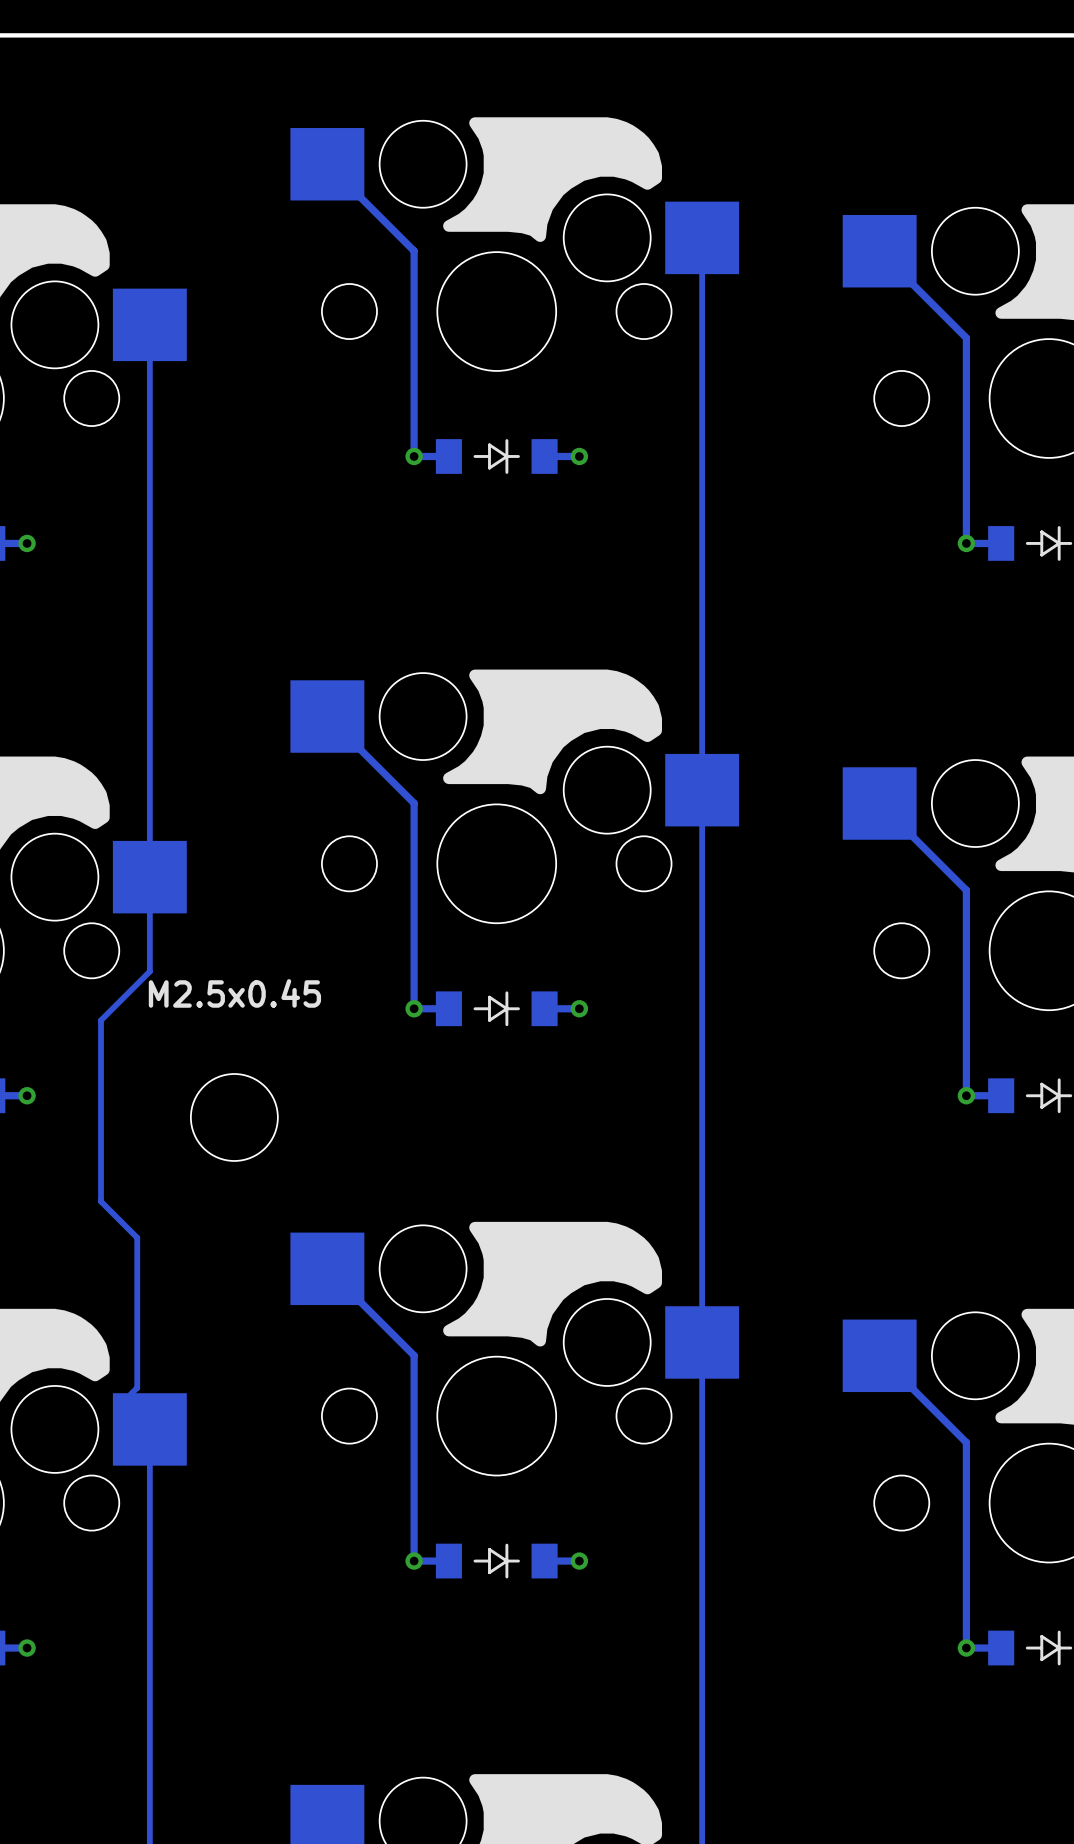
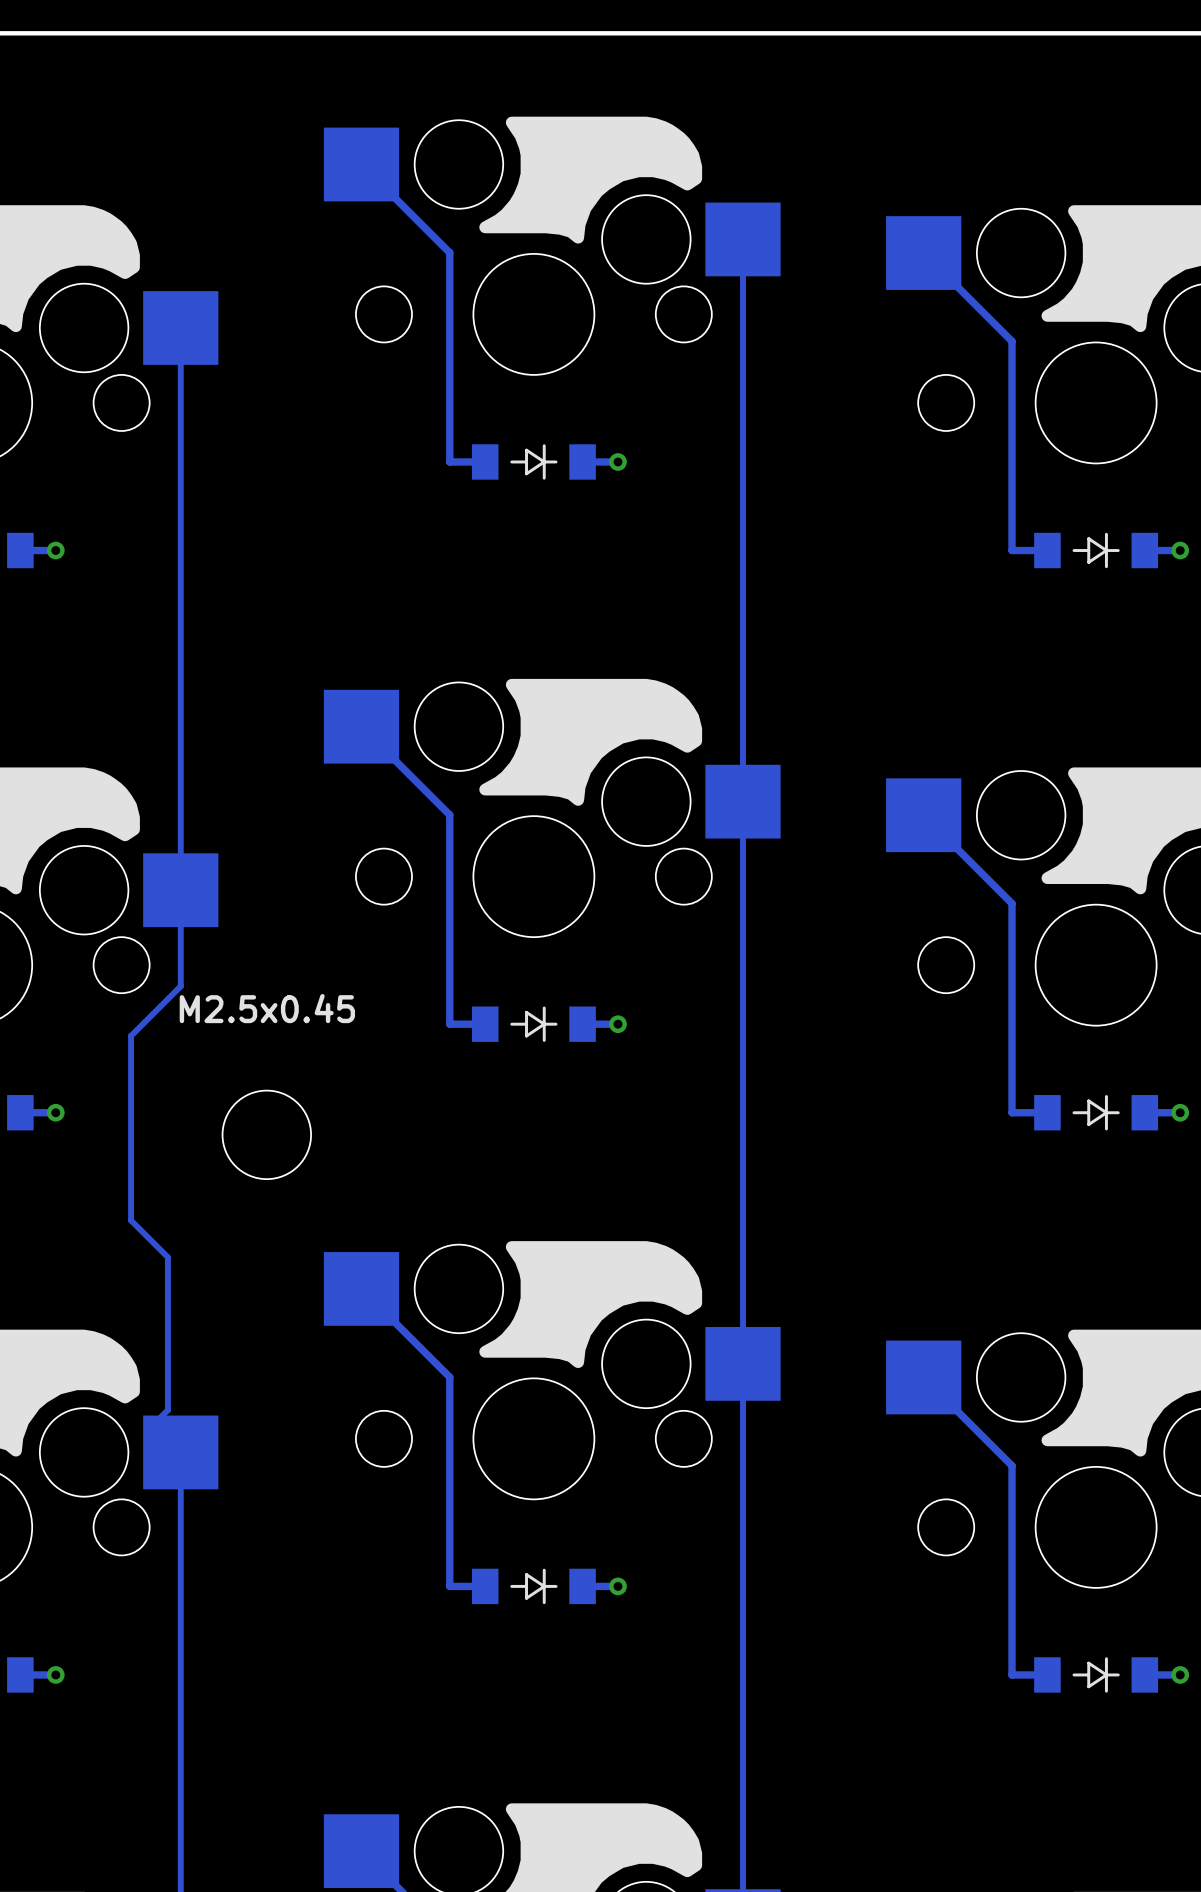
via: (414, 456) -> none
via: (966, 543) -> none
via: (414, 1008) -> none
via: (966, 1095) -> none
via: (414, 1561) -> none
via: (966, 1648) -> none

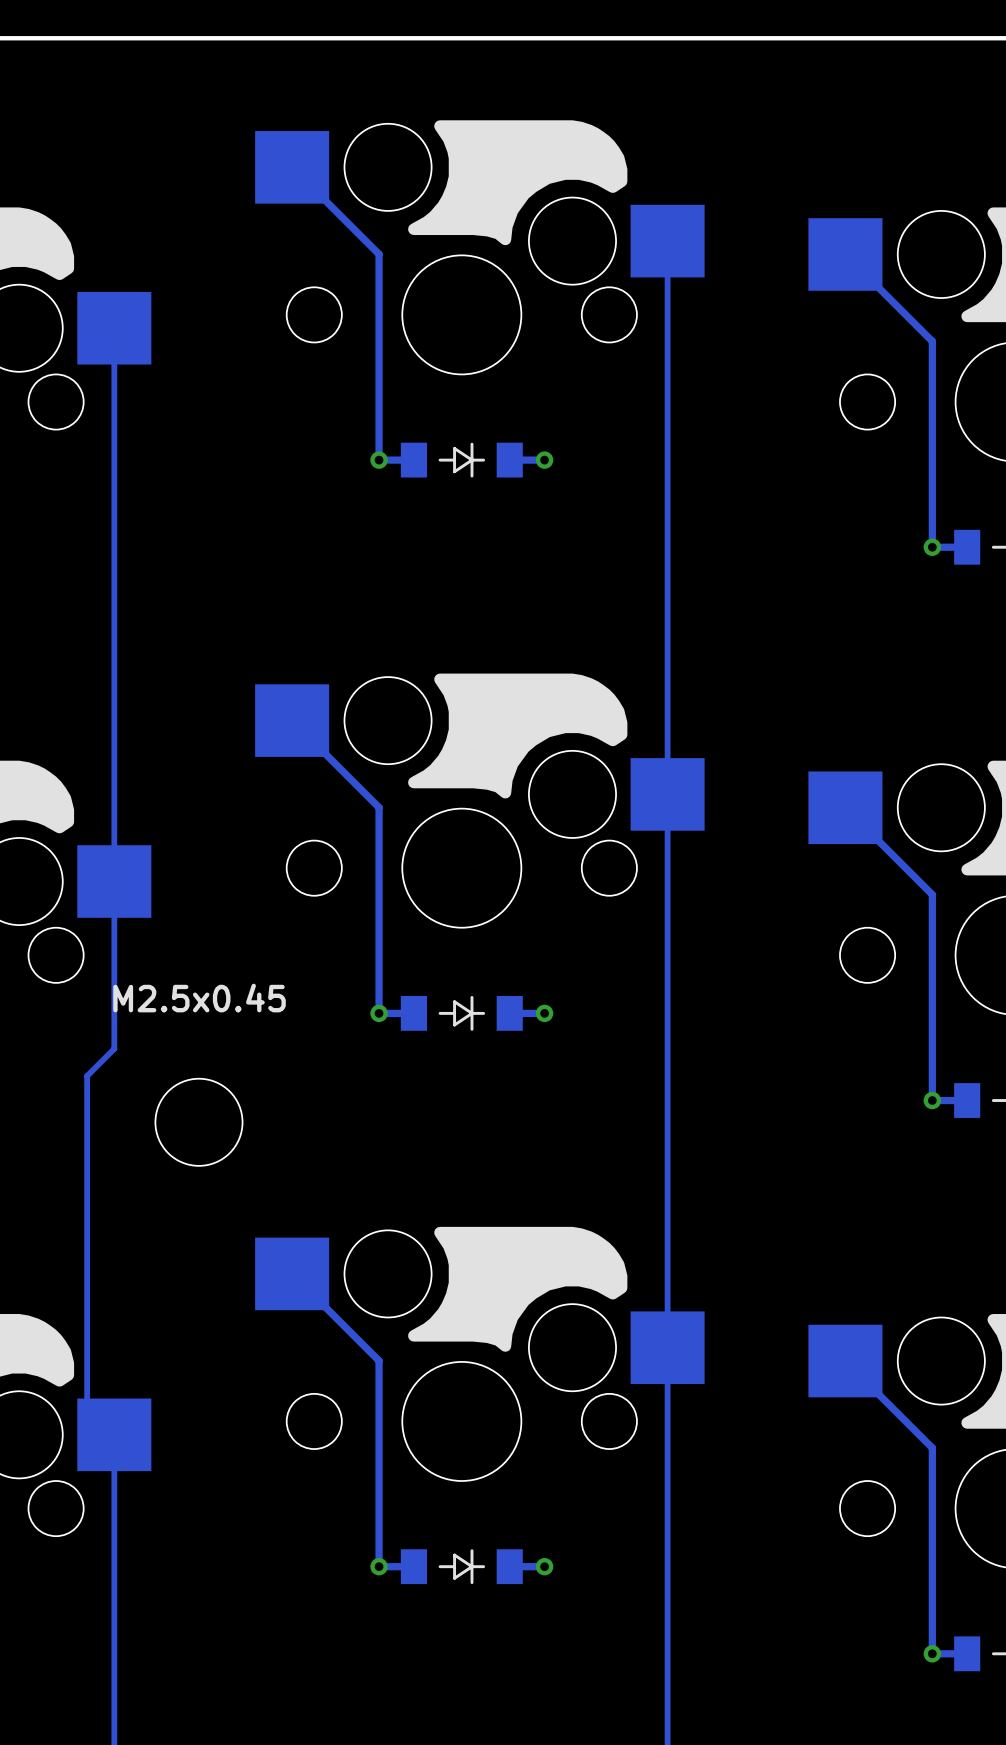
via: none -> (379, 460)
via: none -> (932, 547)
track: (180, 986) (131, 1036) (131, 1220) (167, 1257) (167, 1410) (153, 1424) -> (114, 976) (114, 1048) (87, 1075) (87, 1407) (114, 1434)
via: none -> (379, 1013)
via: none -> (932, 1100)
via: none -> (379, 1566)
via: none -> (932, 1653)

